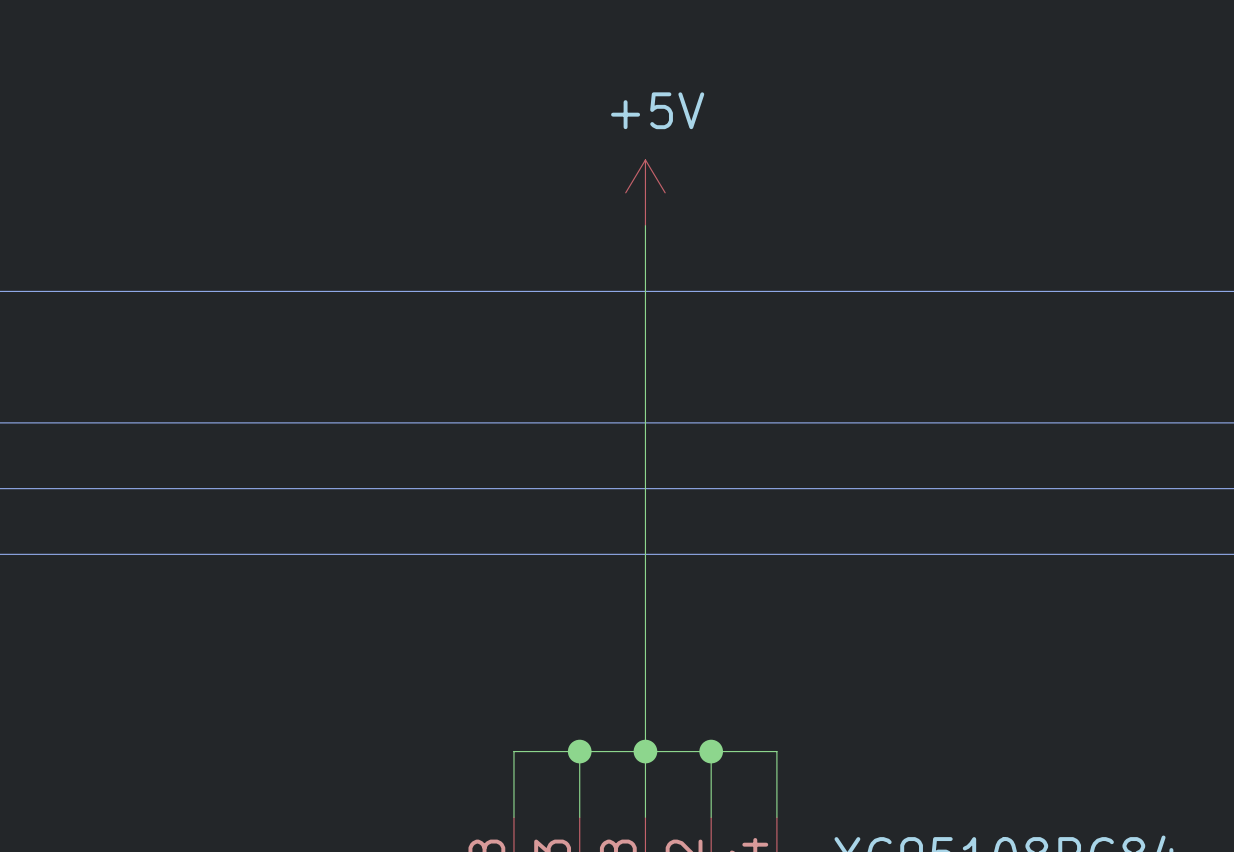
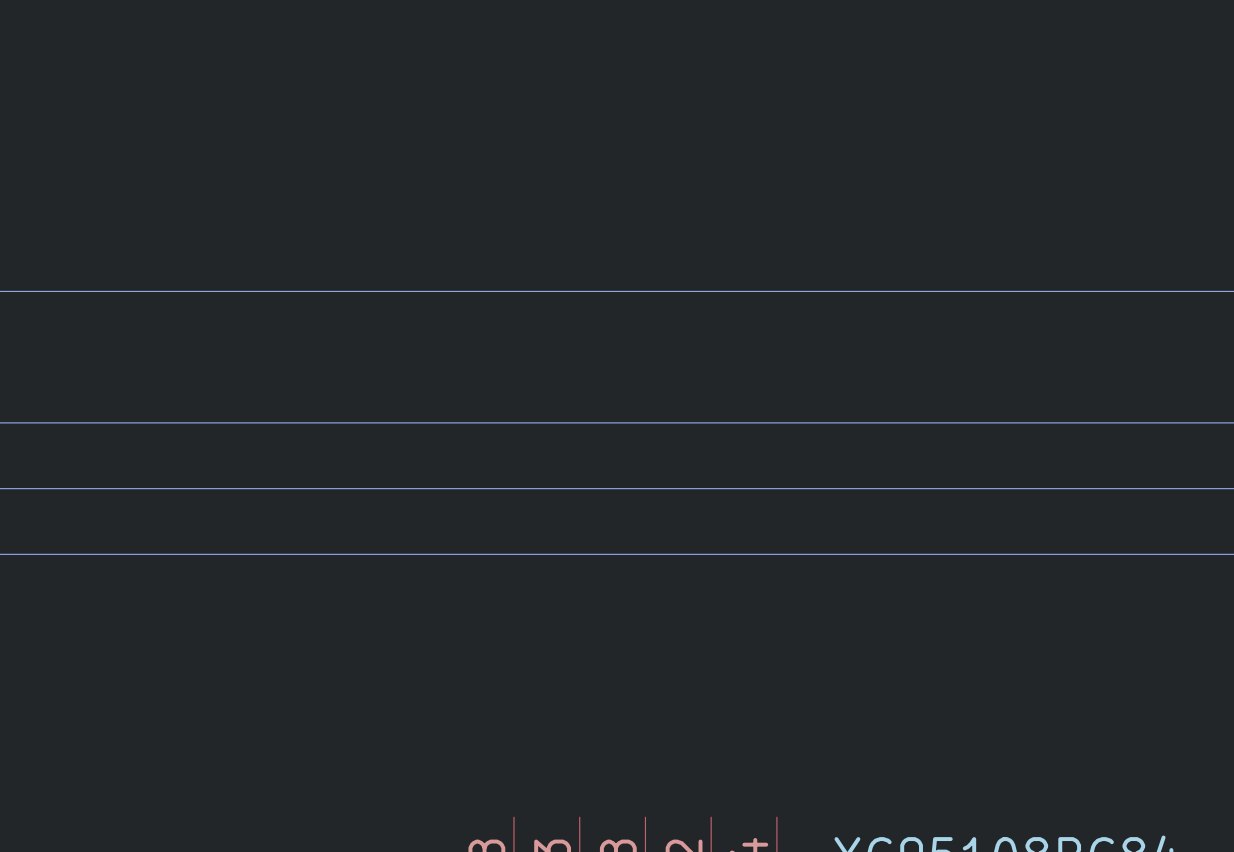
power symbol: +5V (645, 192) -> none
wire: (645, 225) (645, 817) -> none
wire: (579, 751) (579, 817) -> none
junction: (579, 751) -> none
junction: (645, 751) -> none
wire: (711, 751) (711, 817) -> none
junction: (711, 751) -> none
wire: (513, 817) (513, 751) (776, 751) (776, 817) -> none

